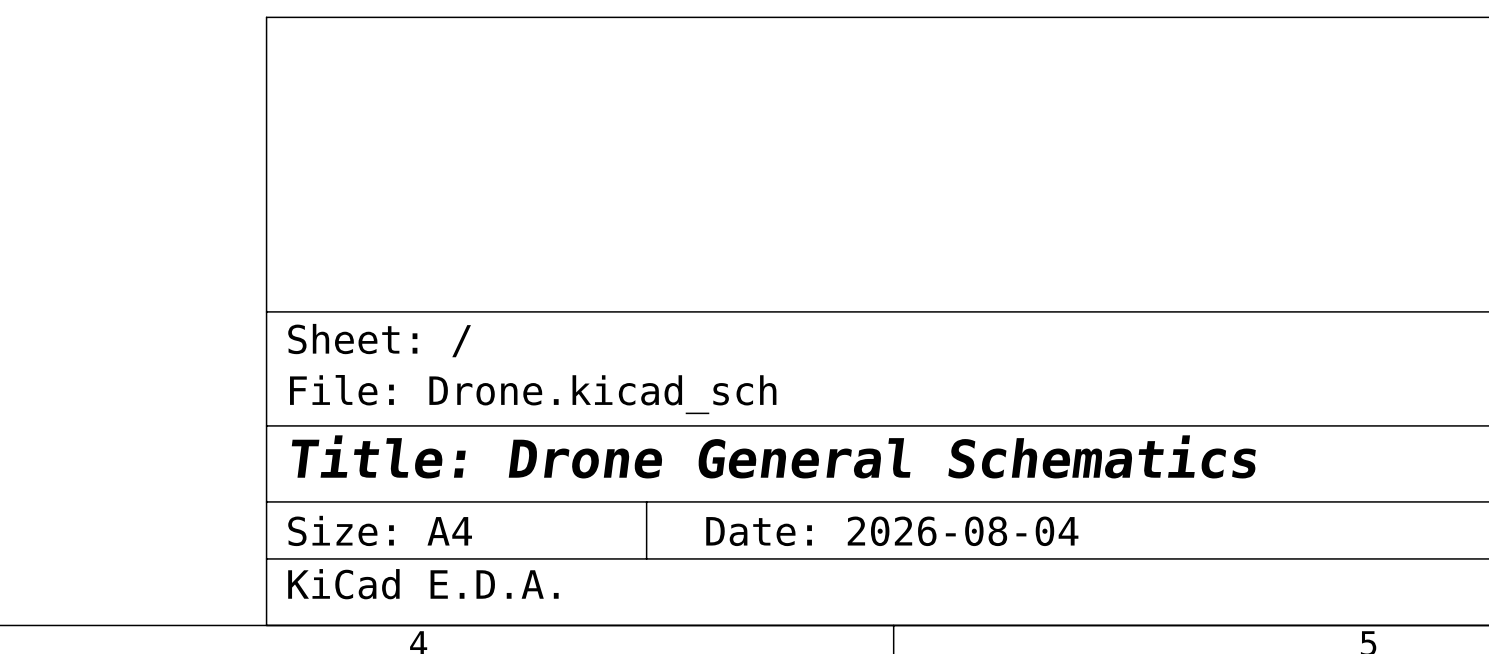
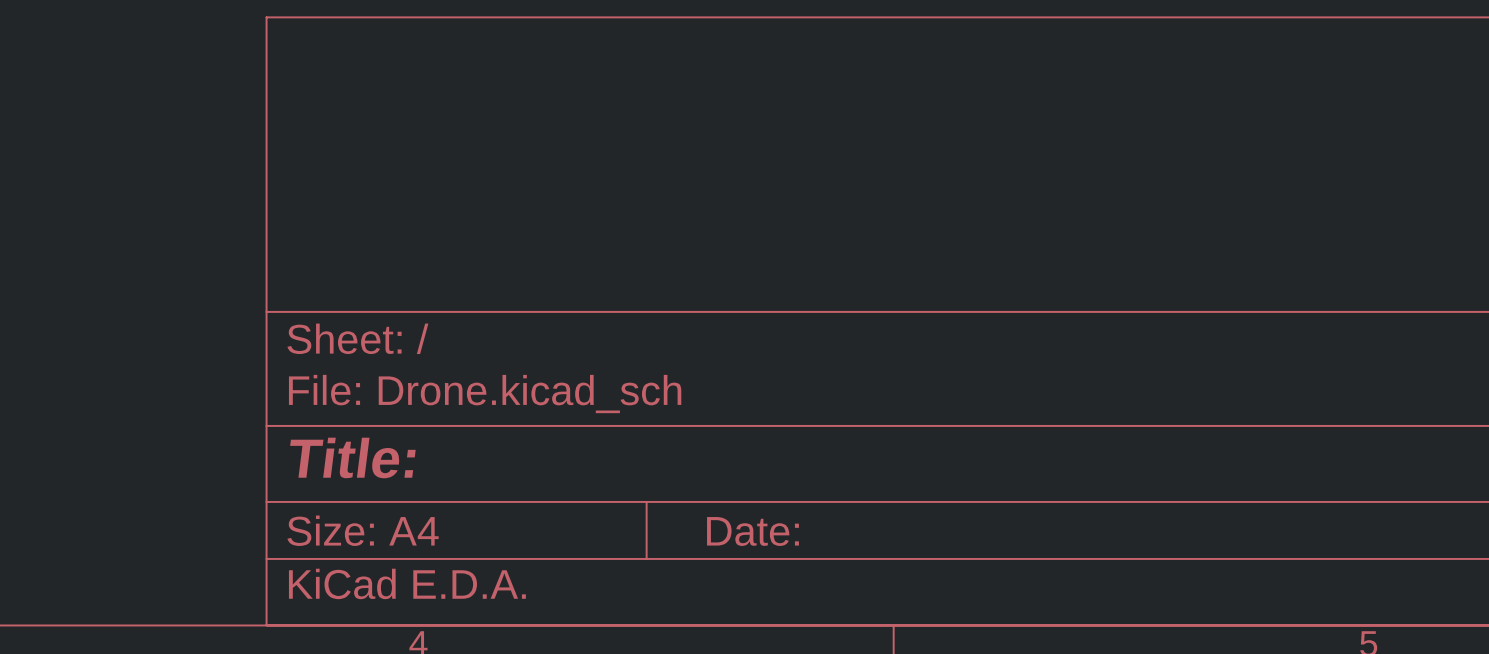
title block: Title: Drone General Schematics (773, 456) -> Title: (352, 457)
title block: Date: 2026-08-04 (892, 531) -> Date: (752, 531)

